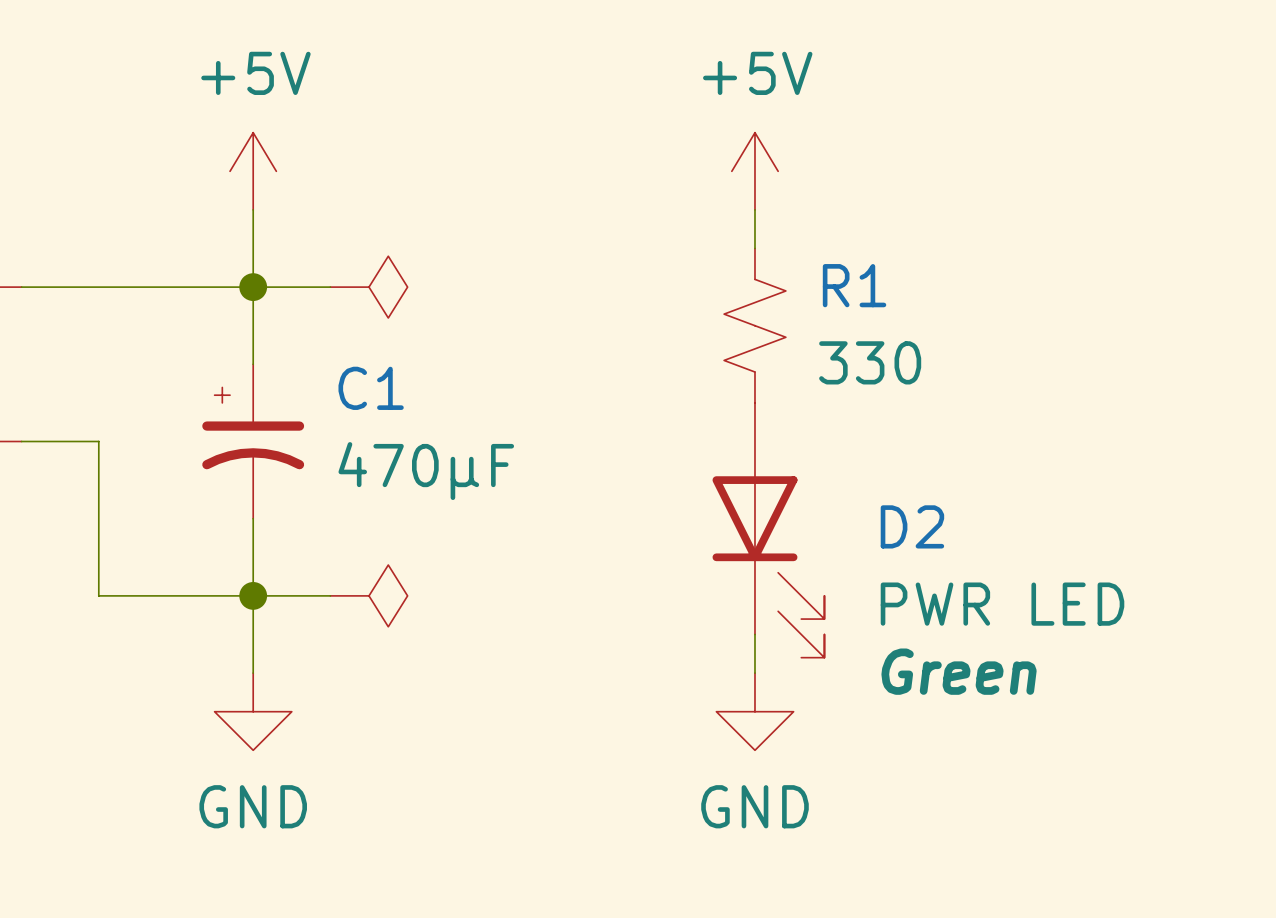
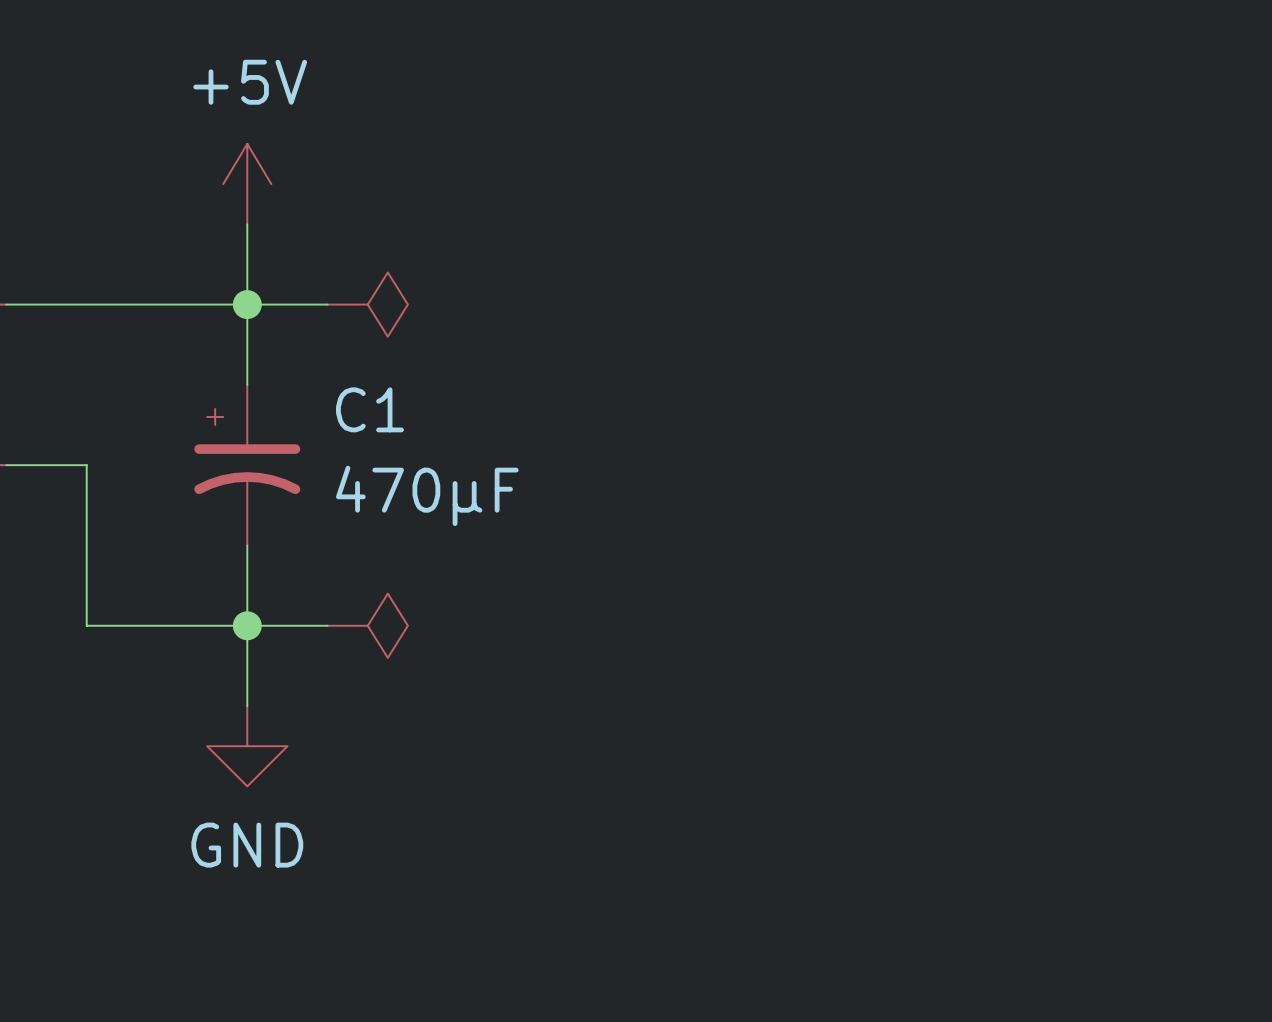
power symbol: +5V (754, 171) -> none
wire: (754, 209) (754, 248) -> none
R1: 330 (754, 325) -> none
D2: PWR LED (768, 530) -> none
wire: (754, 634) (754, 673) -> none
power symbol: GND (754, 711) -> none

